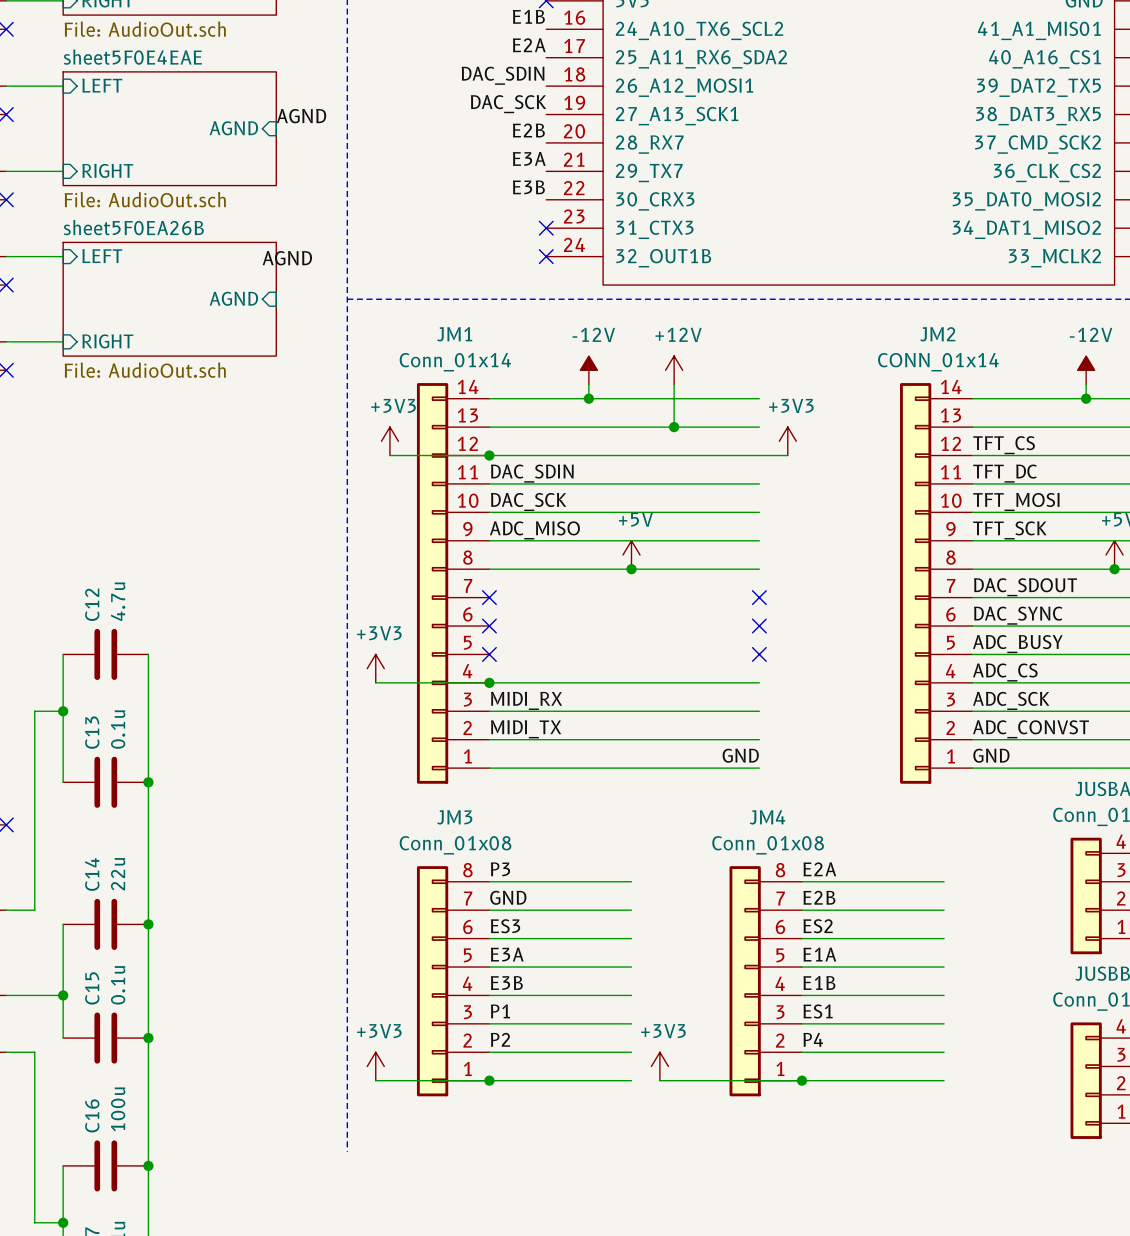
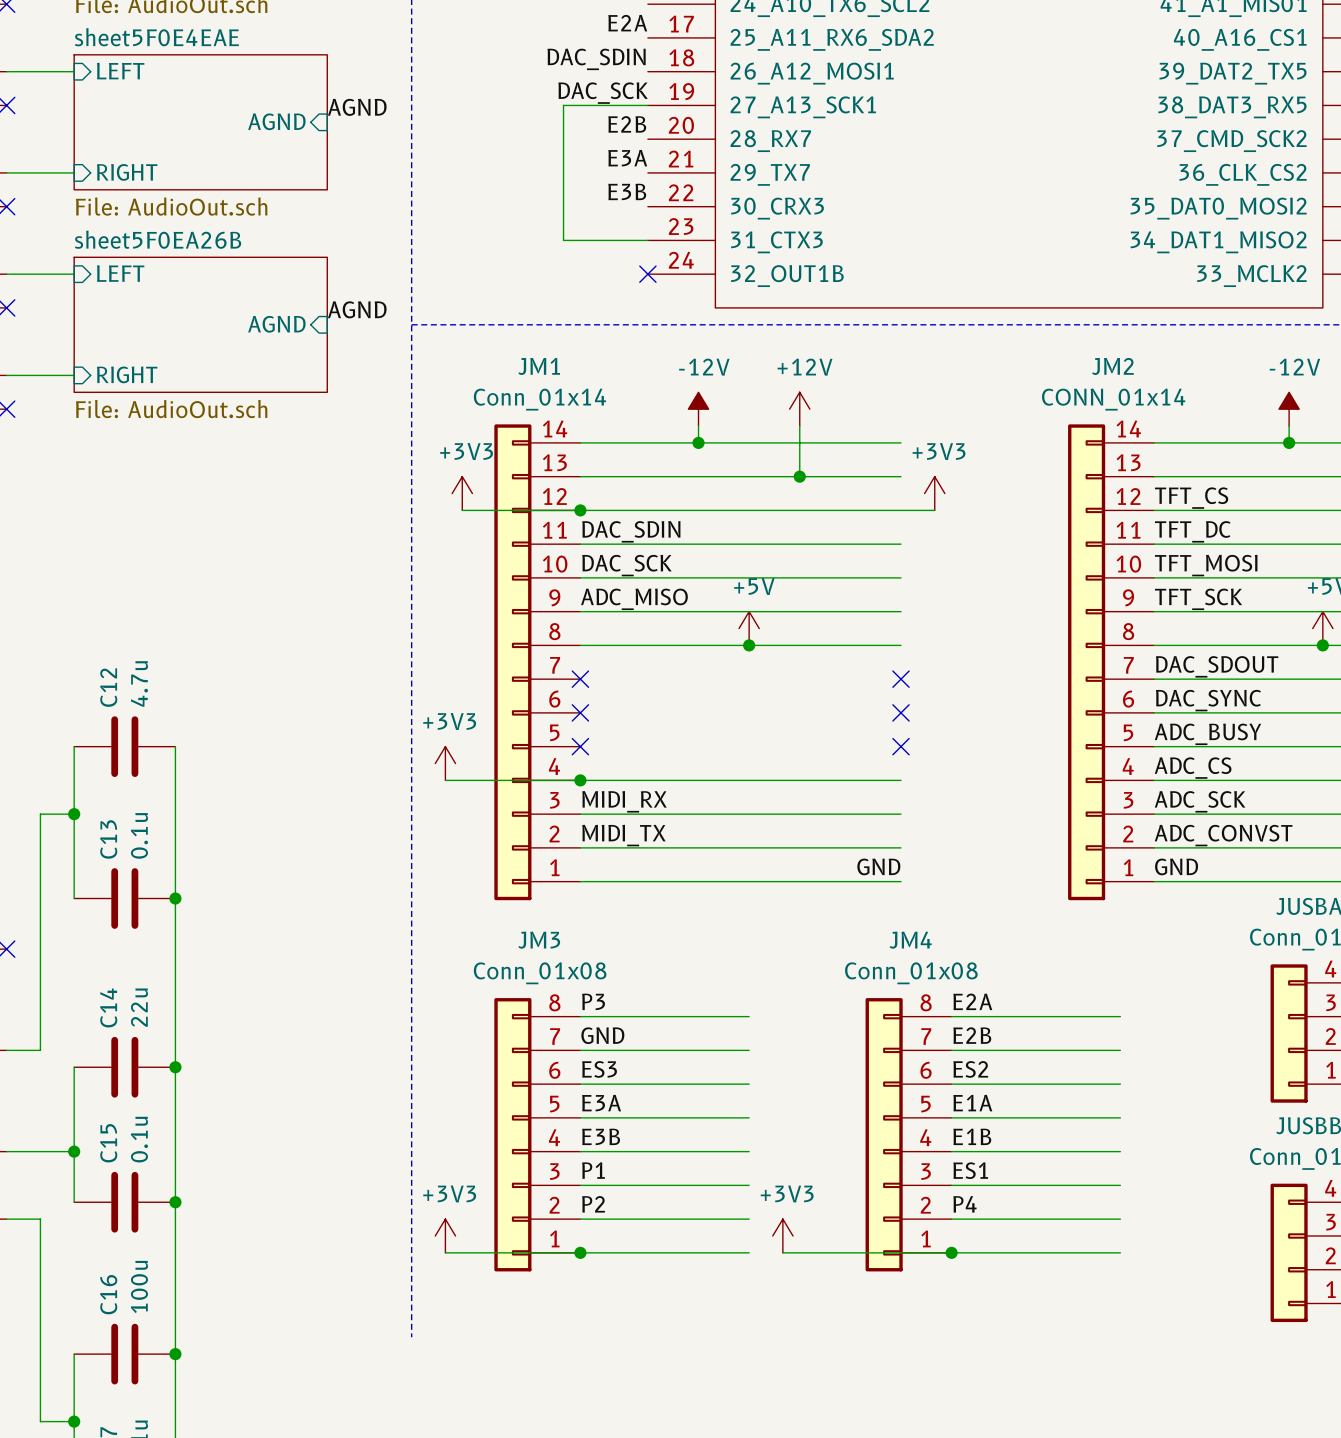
wire: none -> (647, 105) (563, 105) (563, 240) (647, 240)
no-connect mark: (546, 228) -> none
label position: AGND (287, 258) -> AGND (357, 309)

